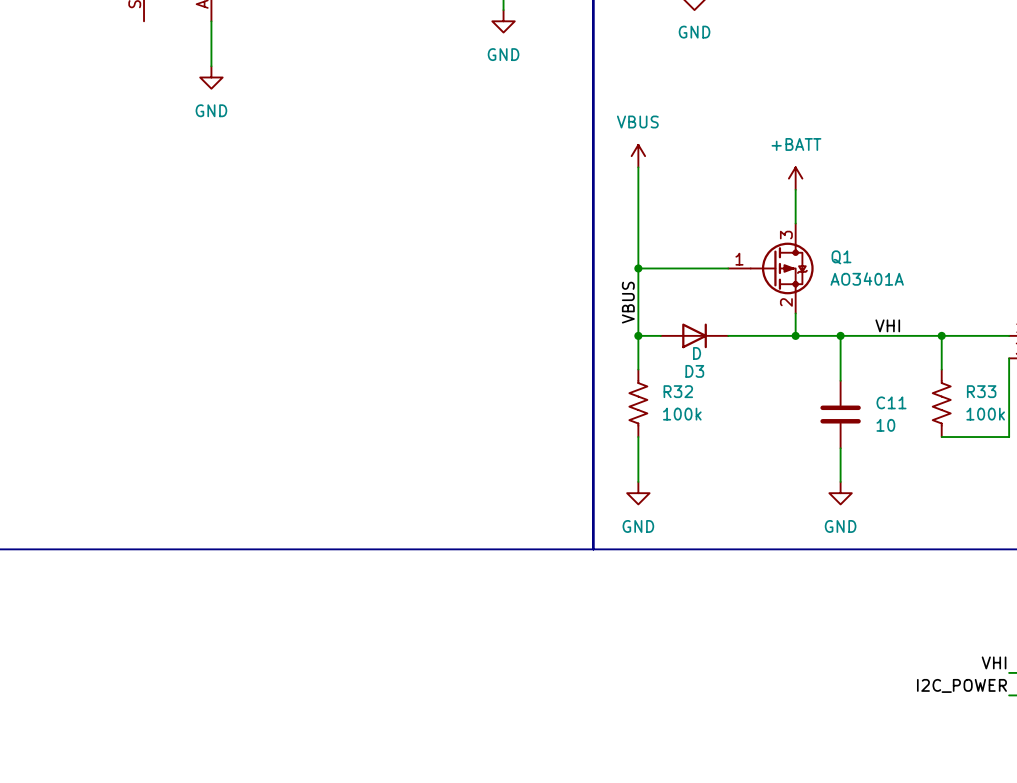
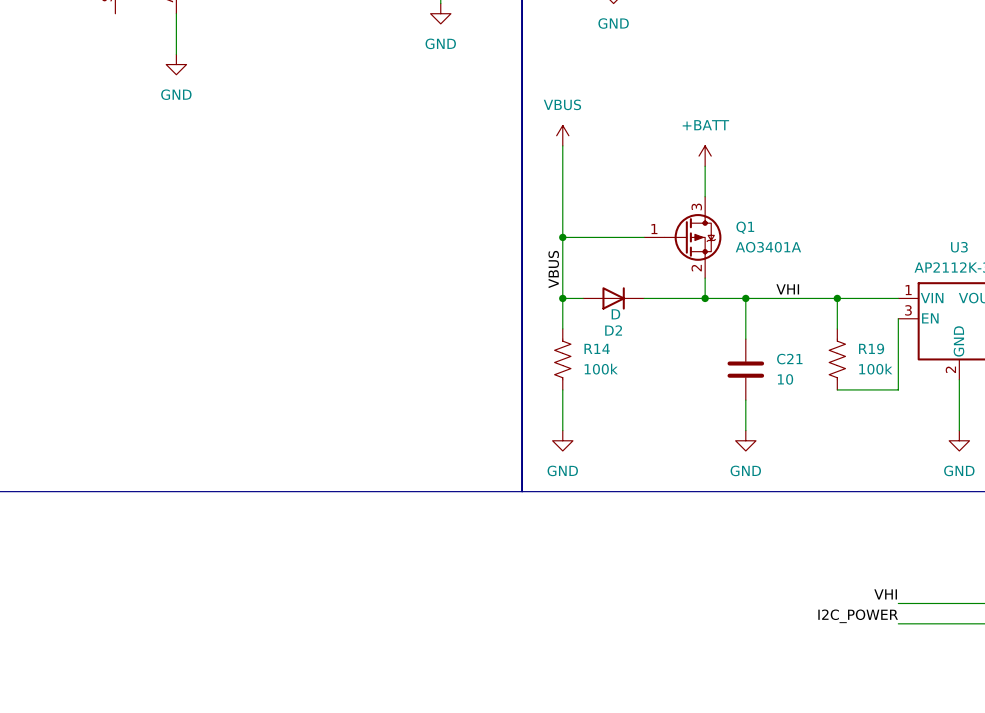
D3 name: D3 (694, 371) -> D2 (613, 330)
R32 name: R32 (678, 391) -> R14 (597, 348)
R33 name: R33 (981, 391) -> R19 (871, 348)
C11 name: C11 (891, 402) -> C21 (789, 359)

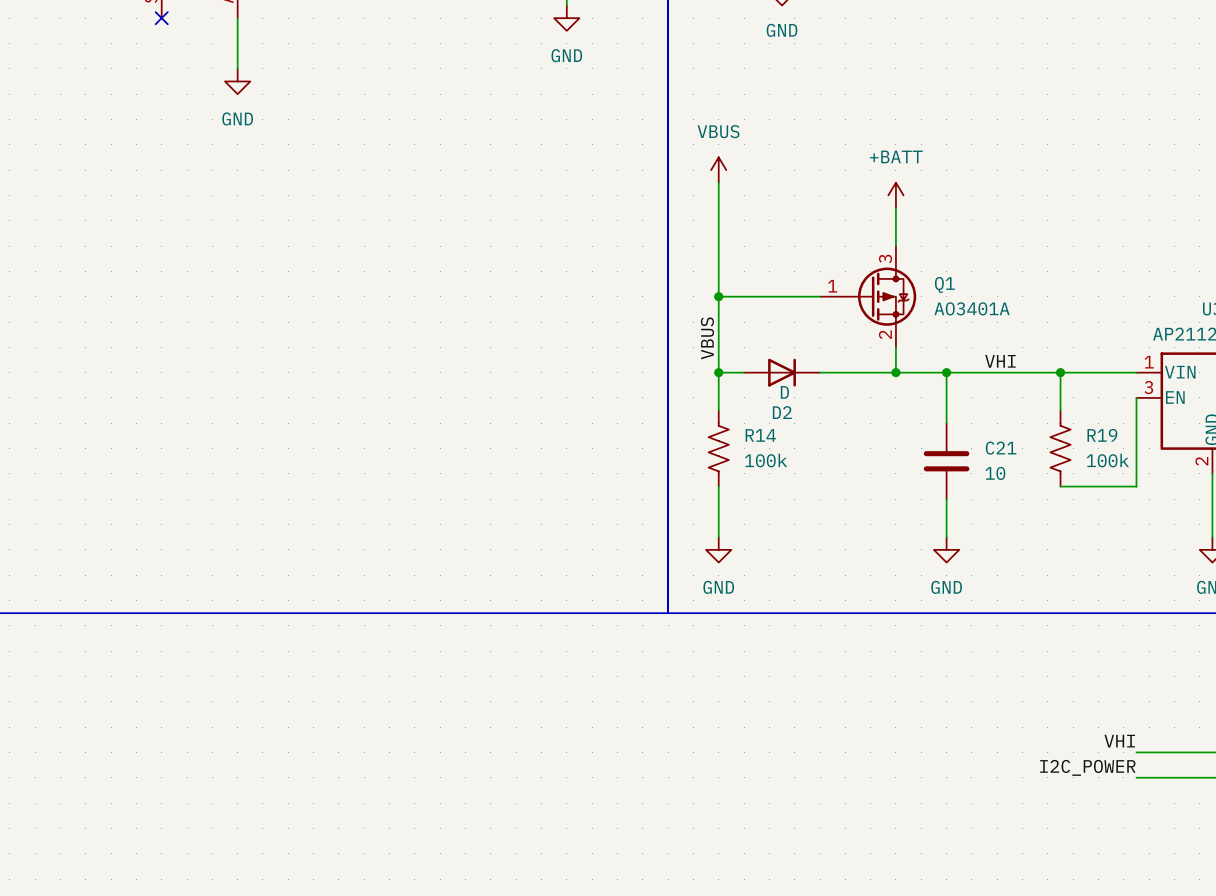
no-connect mark: none -> (161, 18)

